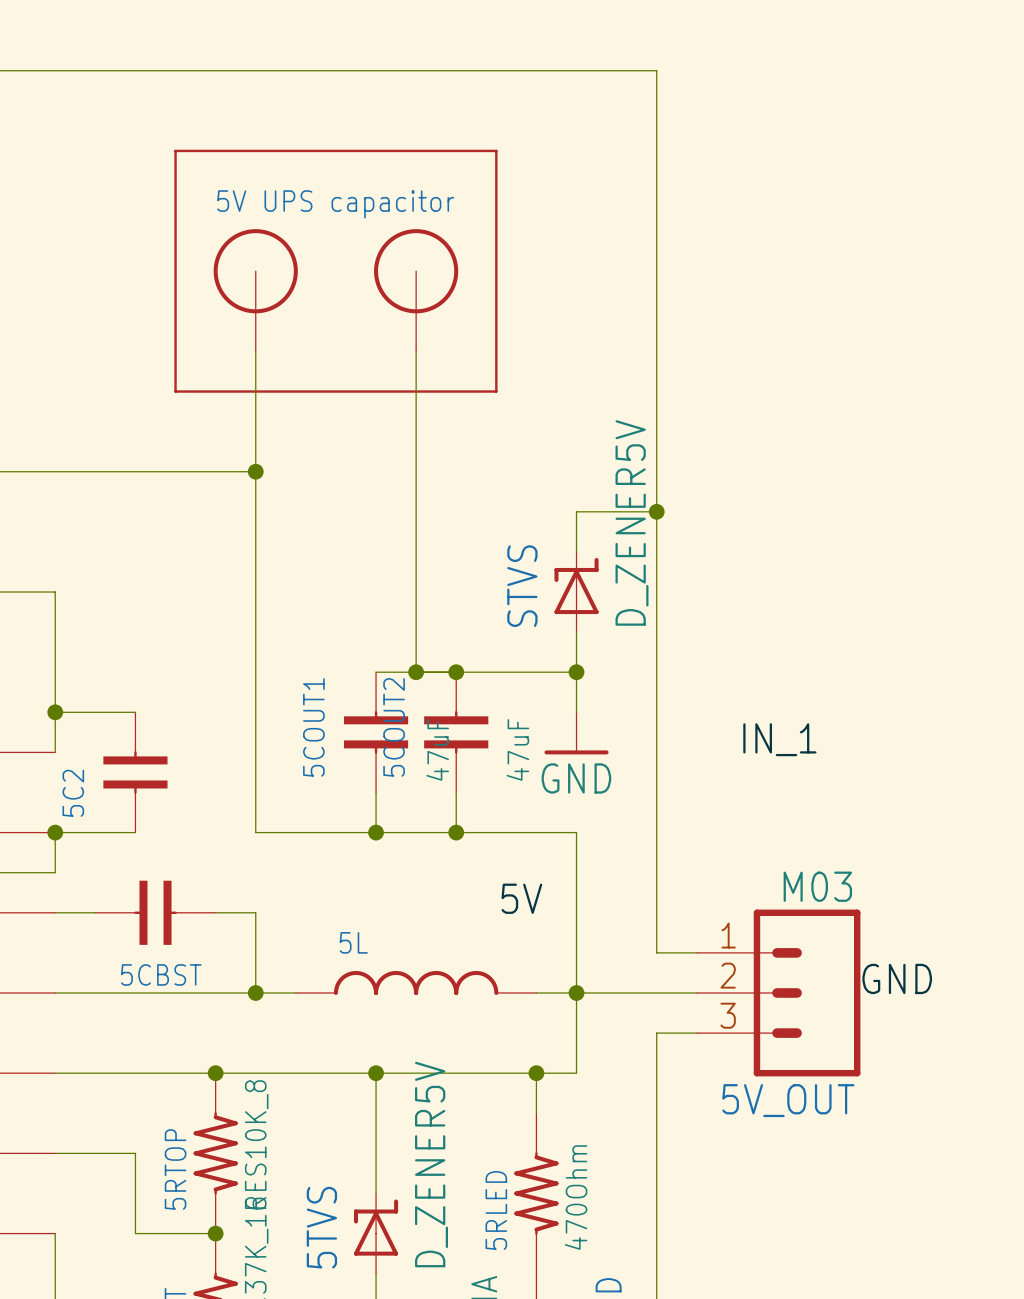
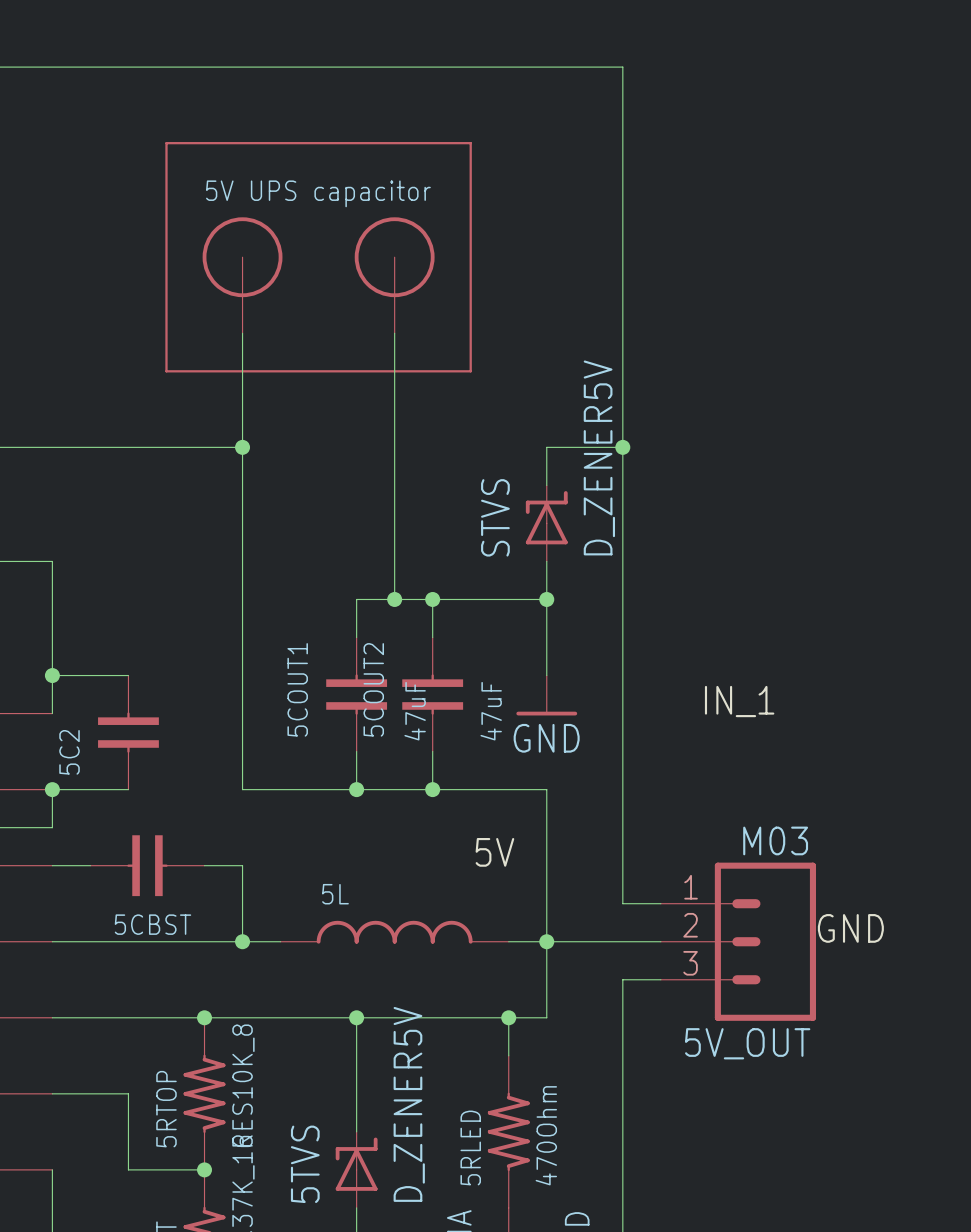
wire: (656, 511) (576, 511) (576, 551) -> (622, 447) (546, 447) (546, 485)
junction position: (656, 511) -> (622, 447)
STVS position: (576, 592) -> (546, 523)
wire: (416, 632) (416, 672) -> (432, 599) (432, 637)
junction: none -> (394, 599)
junction: none -> (432, 599)
wire: (376, 672) (576, 672) -> (356, 637) (356, 599) (546, 599) (546, 561)
junction: (416, 672) -> none
junction: (456, 672) -> none
junction position: (576, 672) -> (546, 599)

